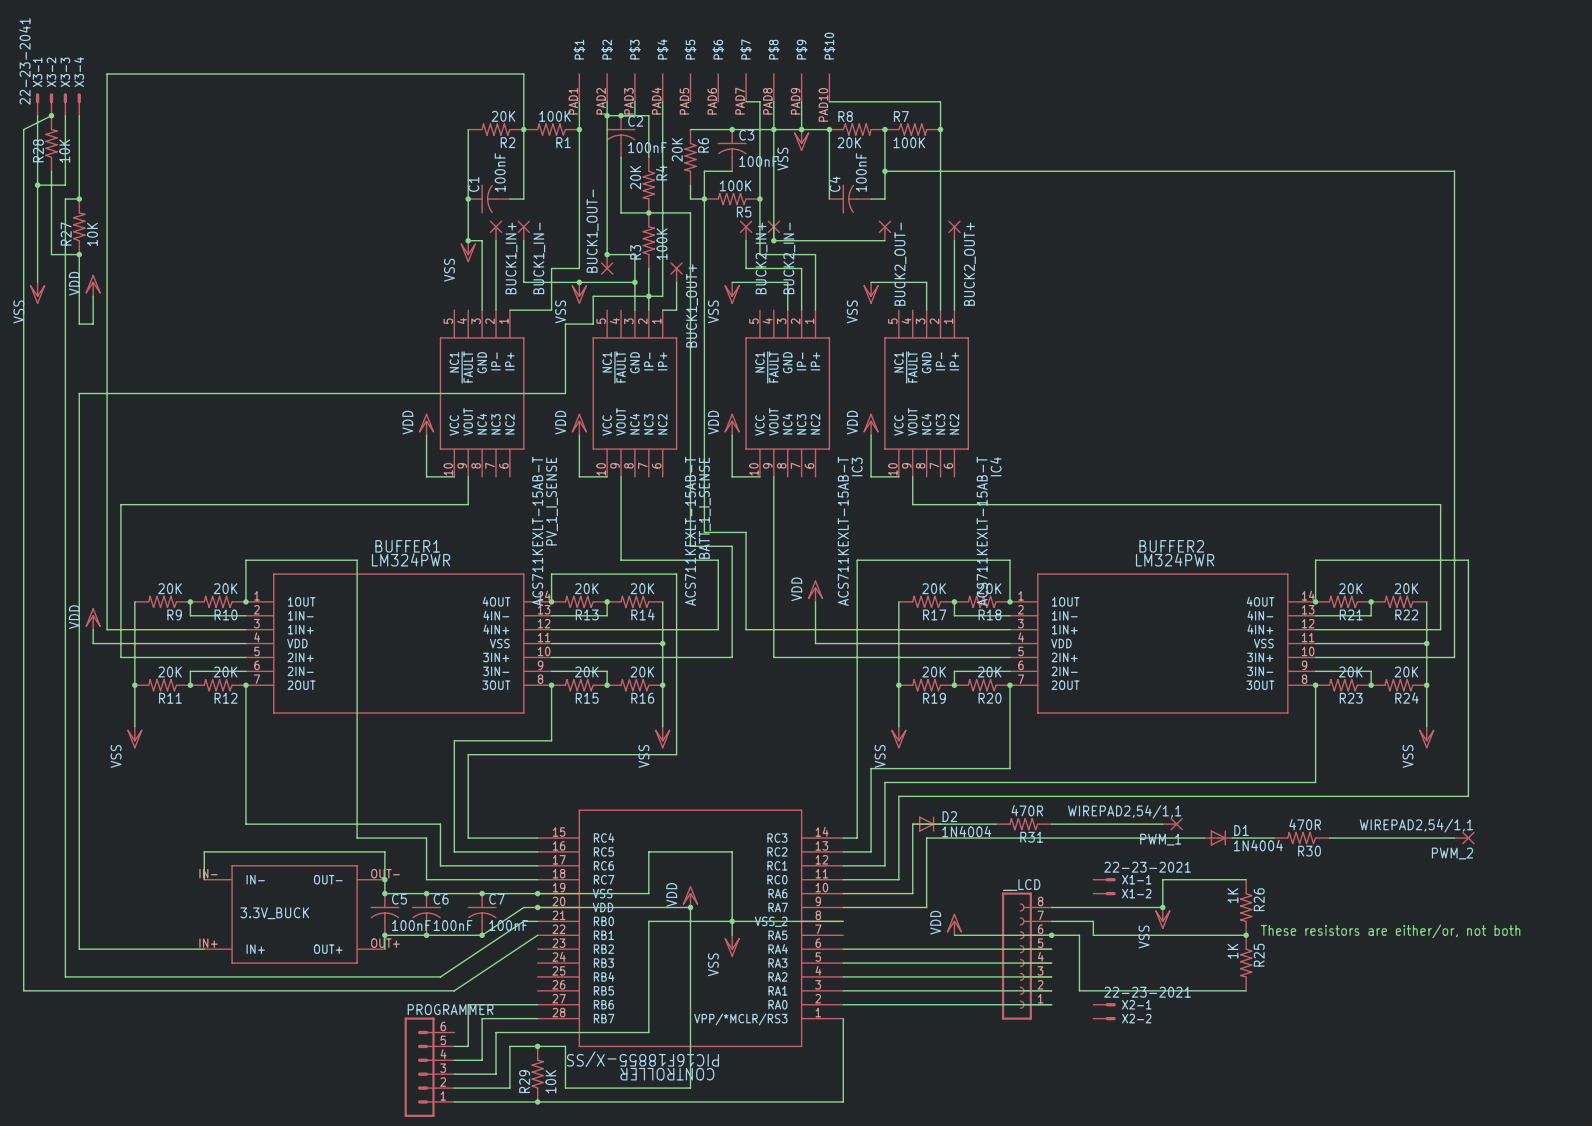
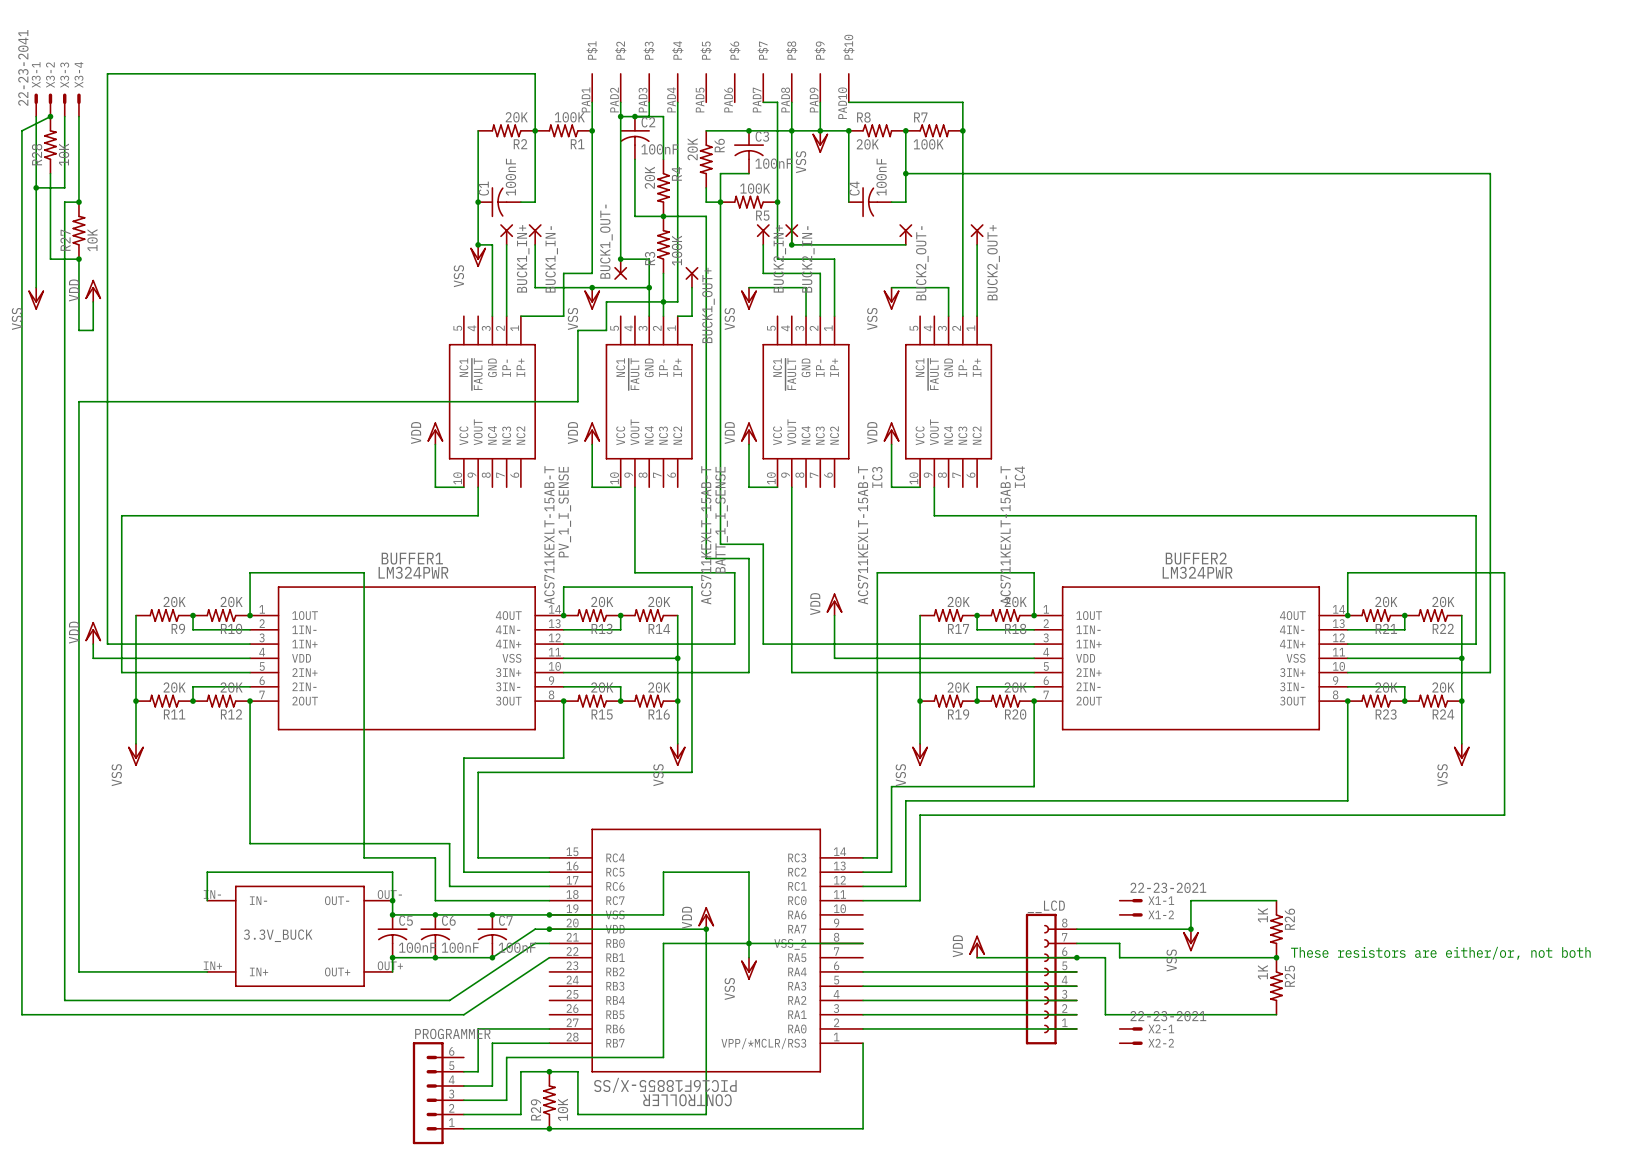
D2: 1N4004 (926, 824) -> none
wire: (996, 824) (912, 824) (912, 893) (843, 893) -> none
R31: 470R (1023, 824) -> none
wire: (1051, 824) (1162, 824) -> none
PWM_1: WIREPAD2,54/1,1 (1172, 824) -> none
wire: (1204, 838) (926, 838) (926, 907) (843, 907) -> none
D1: 1N4004 (1218, 838) -> none
wire: (1232, 838) (1273, 838) -> none
R30: 470R (1301, 838) -> none
wire: (1329, 838) (1454, 838) -> none
PWM_2: WIREPAD2,54/1,1 (1464, 838) -> none

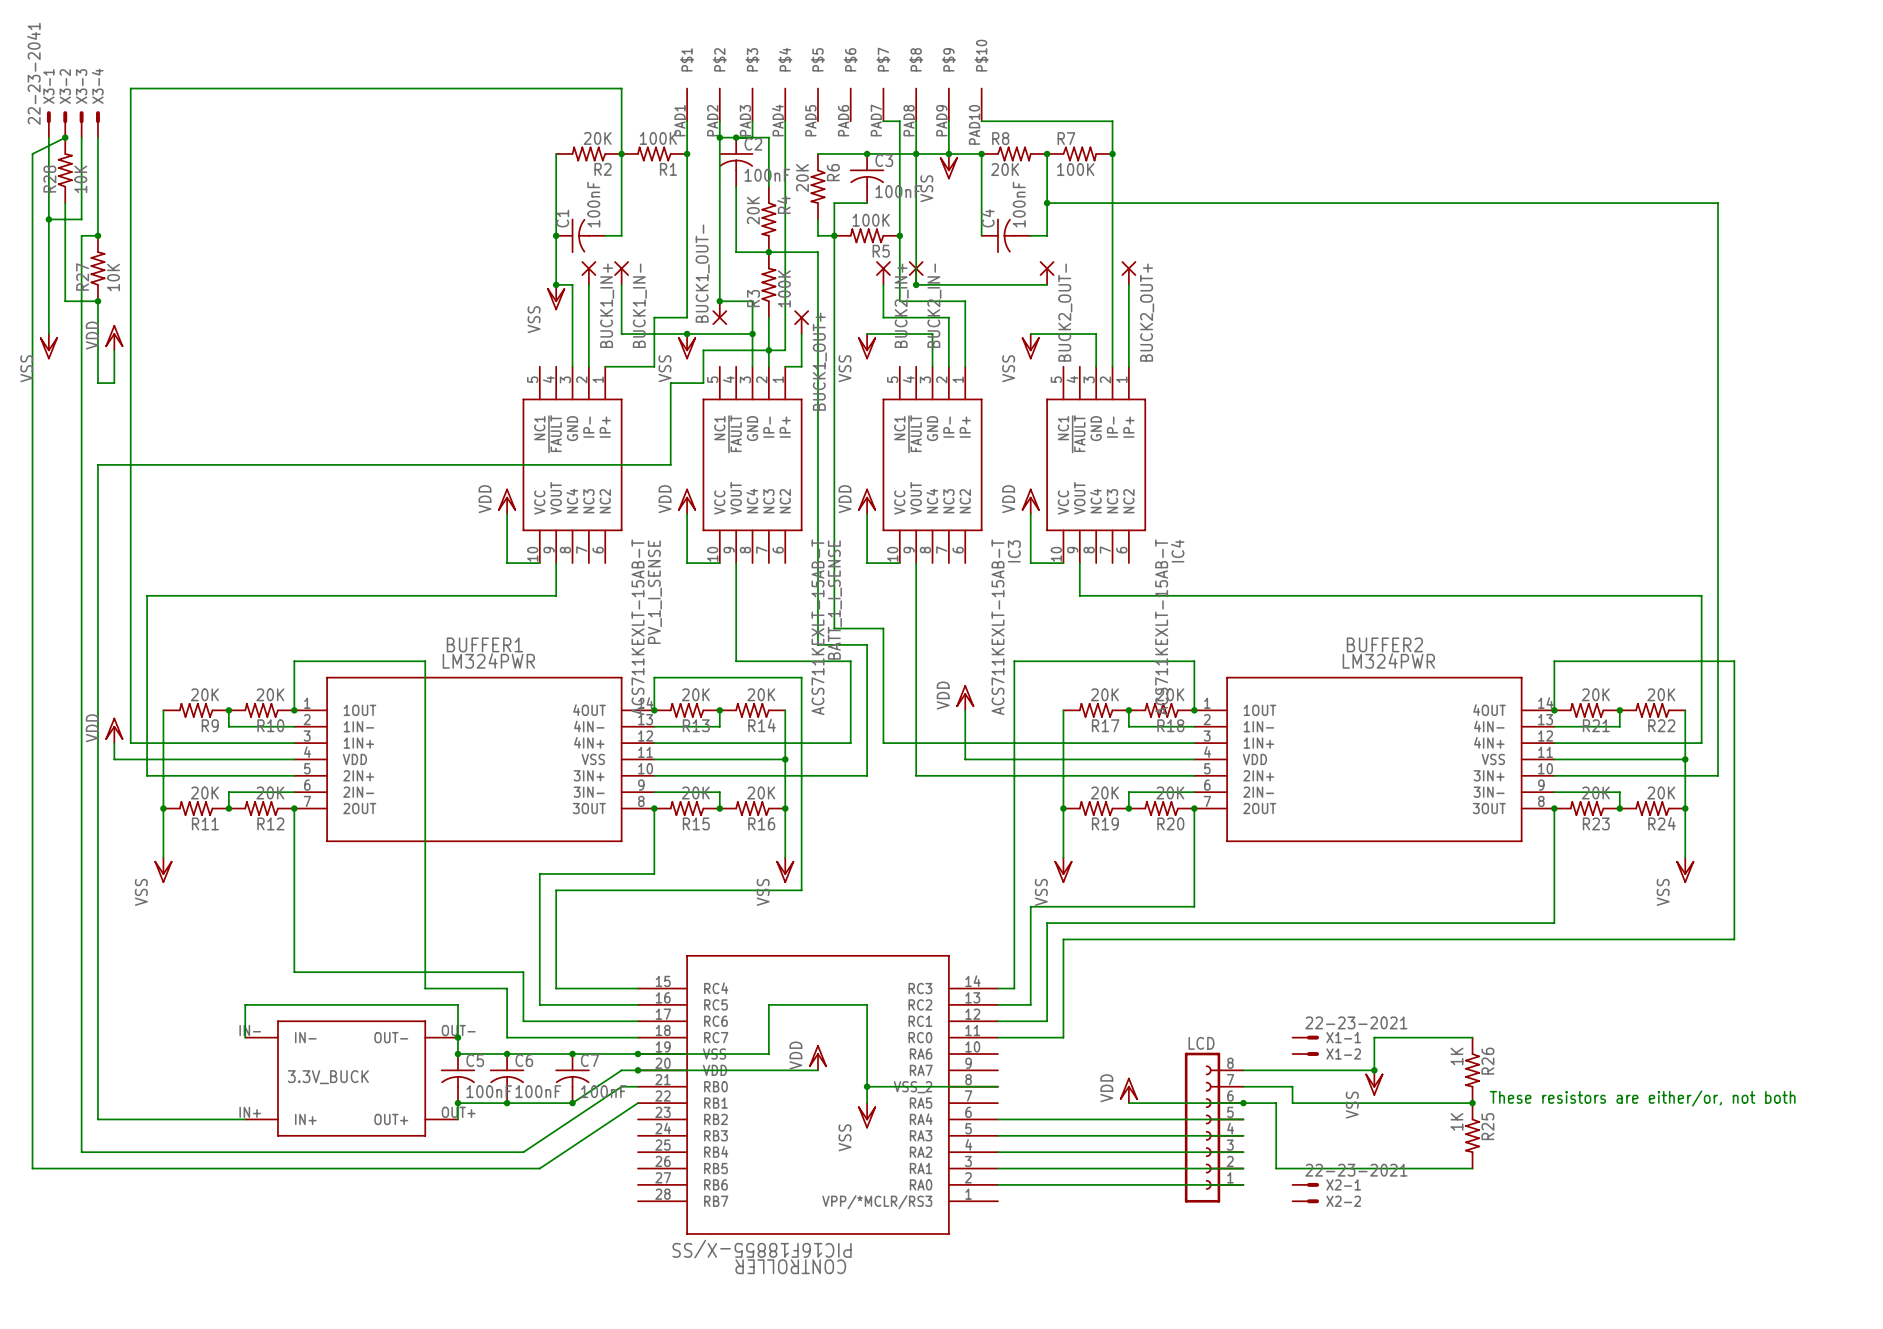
__LCD name: __LCD (1046, 906) -> LCD (1201, 1043)
wire: (706, 929) (706, 1114) (577, 1114) (577, 1071) (520, 1071) (520, 1114) (463, 1114) -> none
junction: (706, 929) -> none
wire: (749, 943) (663, 943) (663, 1057) (506, 1057) (506, 1100) (463, 1100) -> none
wire: (549, 1028) (478, 1028) (478, 1071) (463, 1071) -> none
wire: (549, 1043) (492, 1043) (492, 1086) (463, 1086) -> none
wire: (863, 1043) (863, 1128) (463, 1128) -> none
junction: (549, 1071) -> none
PROGRAMMER: (438, 1093) -> none
R29: 10K (549, 1100) -> none
junction: (549, 1128) -> none

